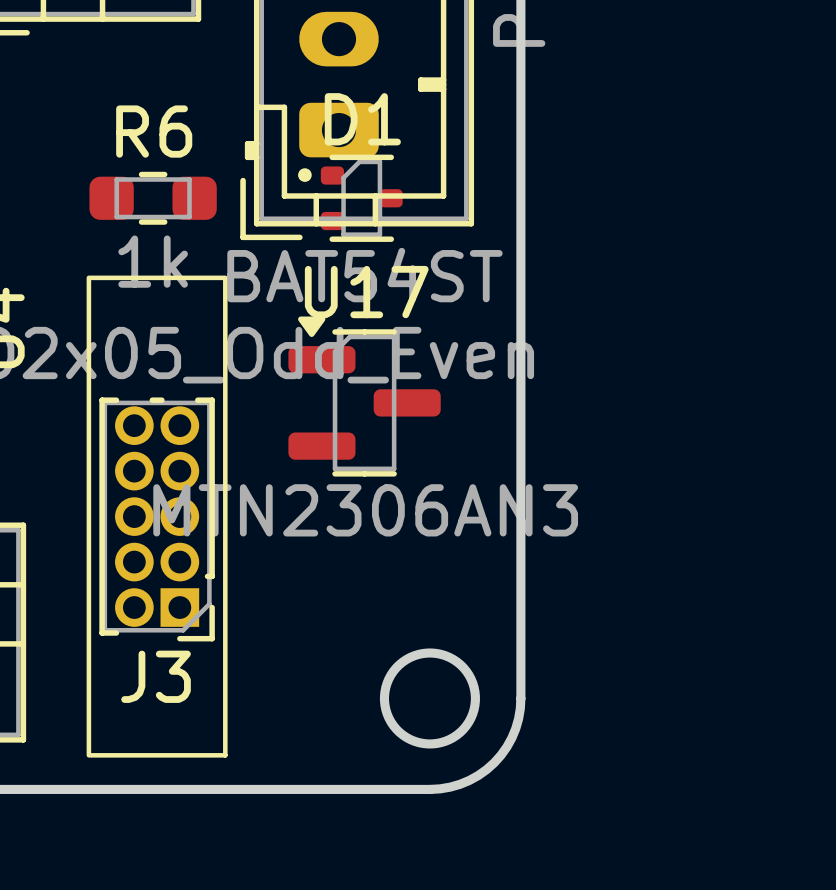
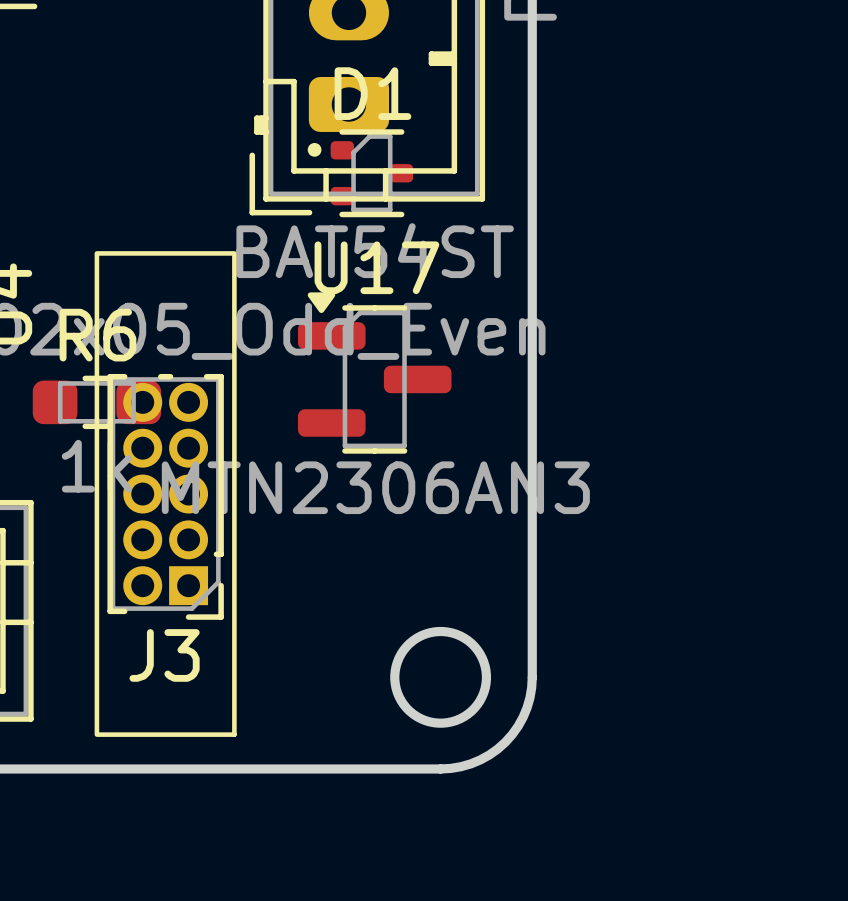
R6 position: (153, 198) -> (96, 402)

